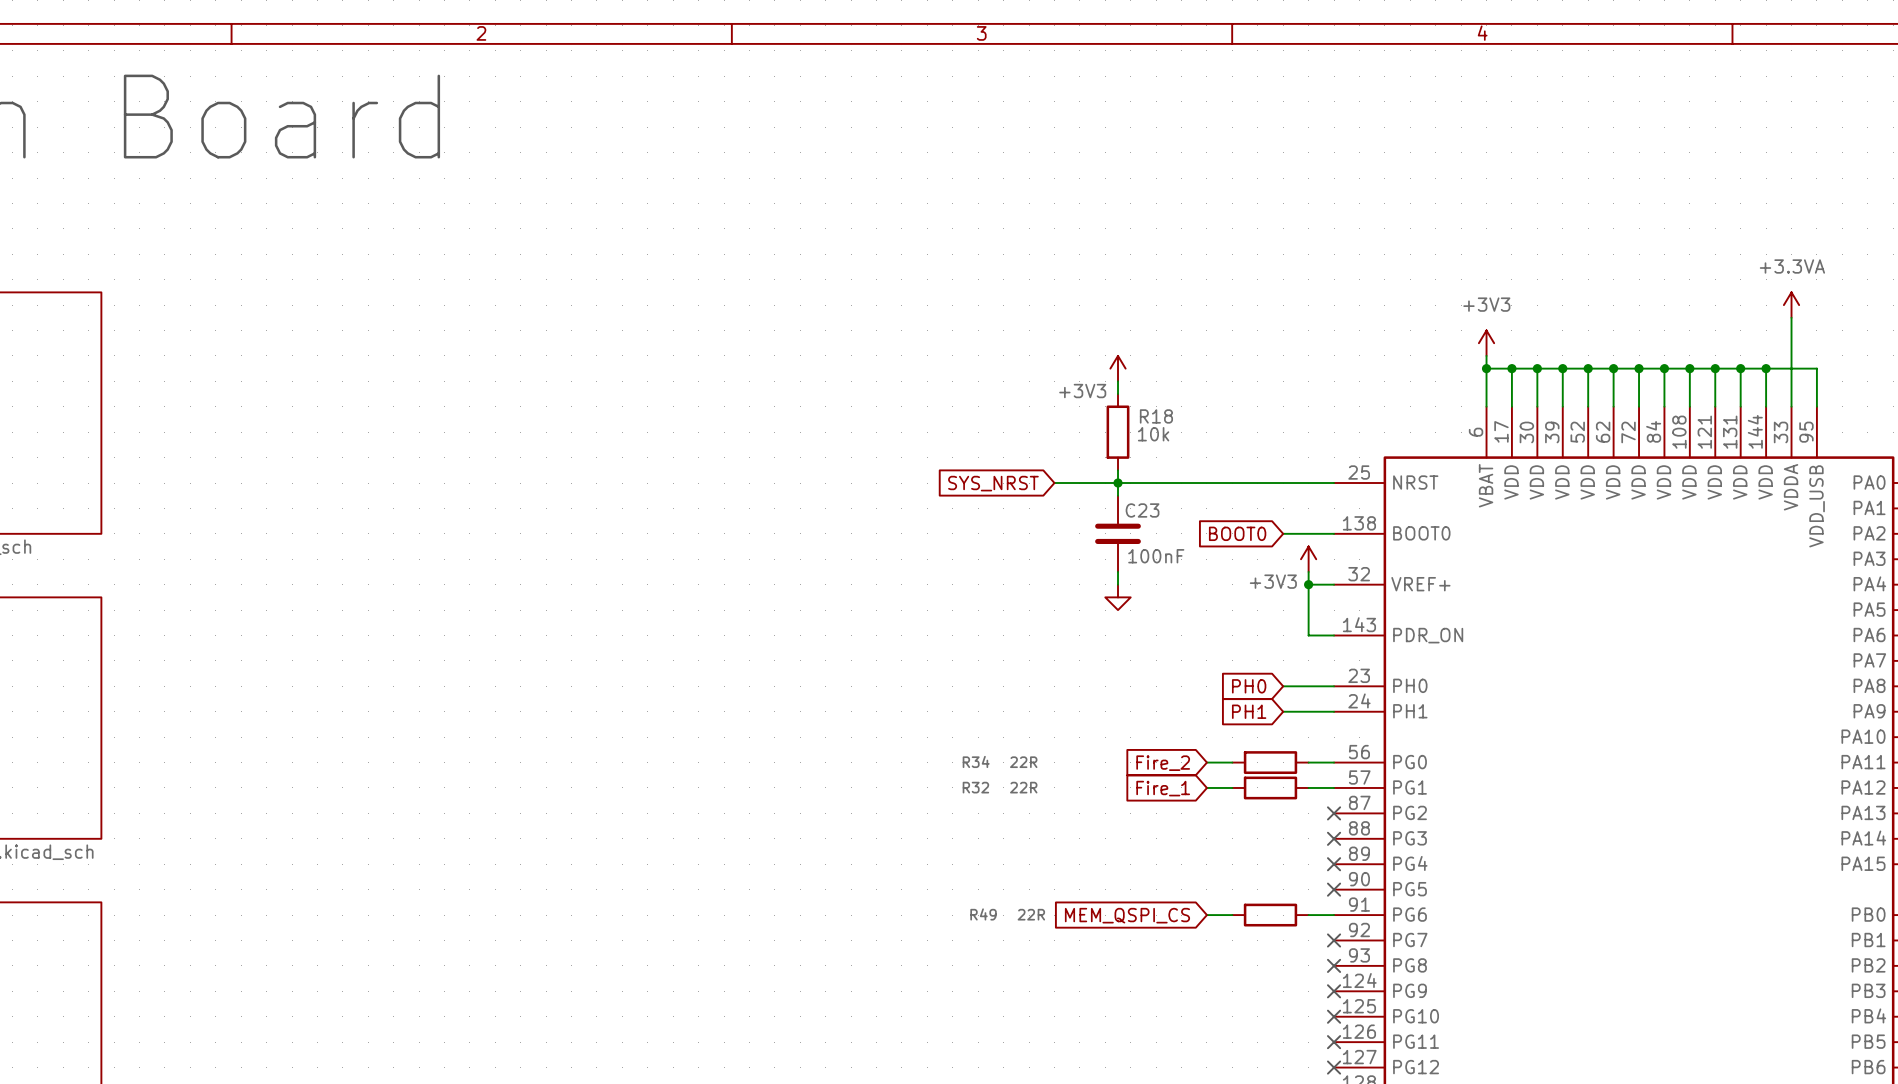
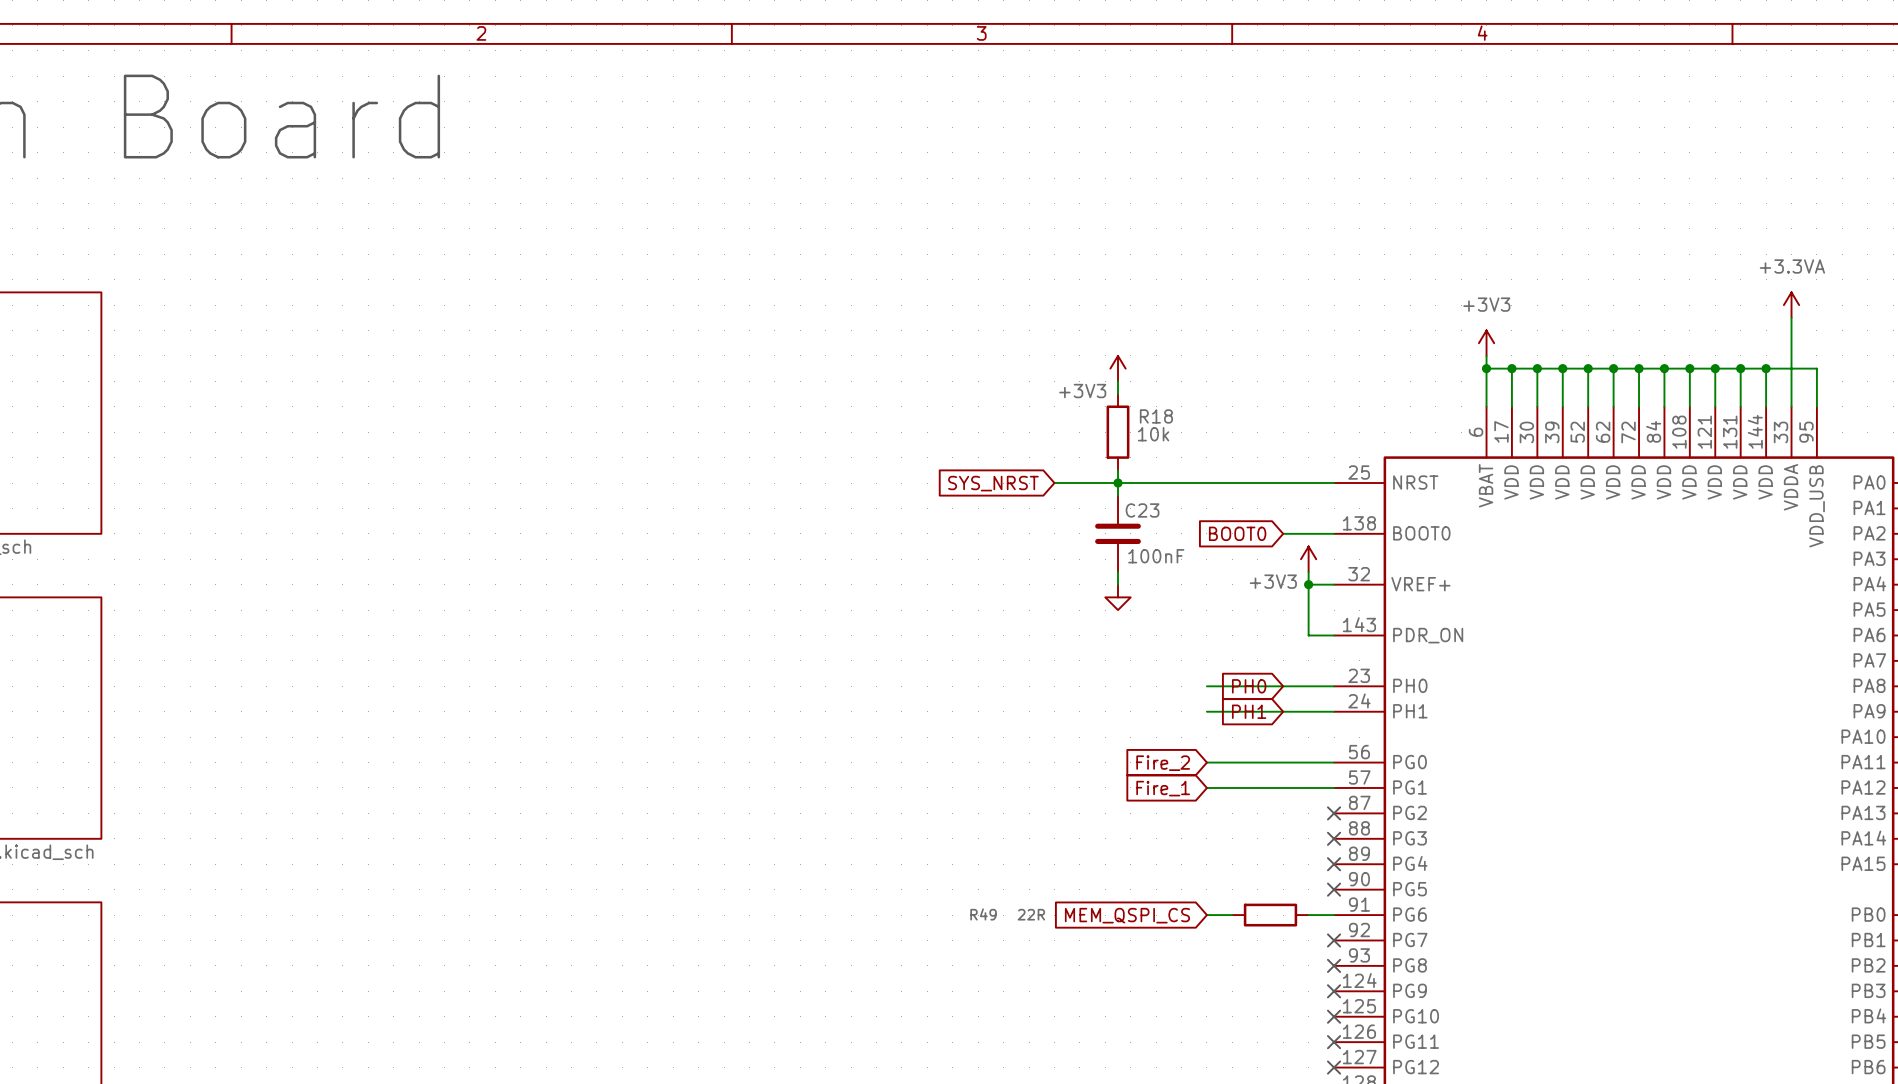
wire: none -> (1206, 686) (1283, 686)
wire: none -> (1206, 711) (1283, 711)
wire: none -> (1232, 762) (1308, 762)
R34: 22R (1270, 762) -> none
wire: none -> (1232, 787) (1308, 787)
R32: 22R (1270, 787) -> none

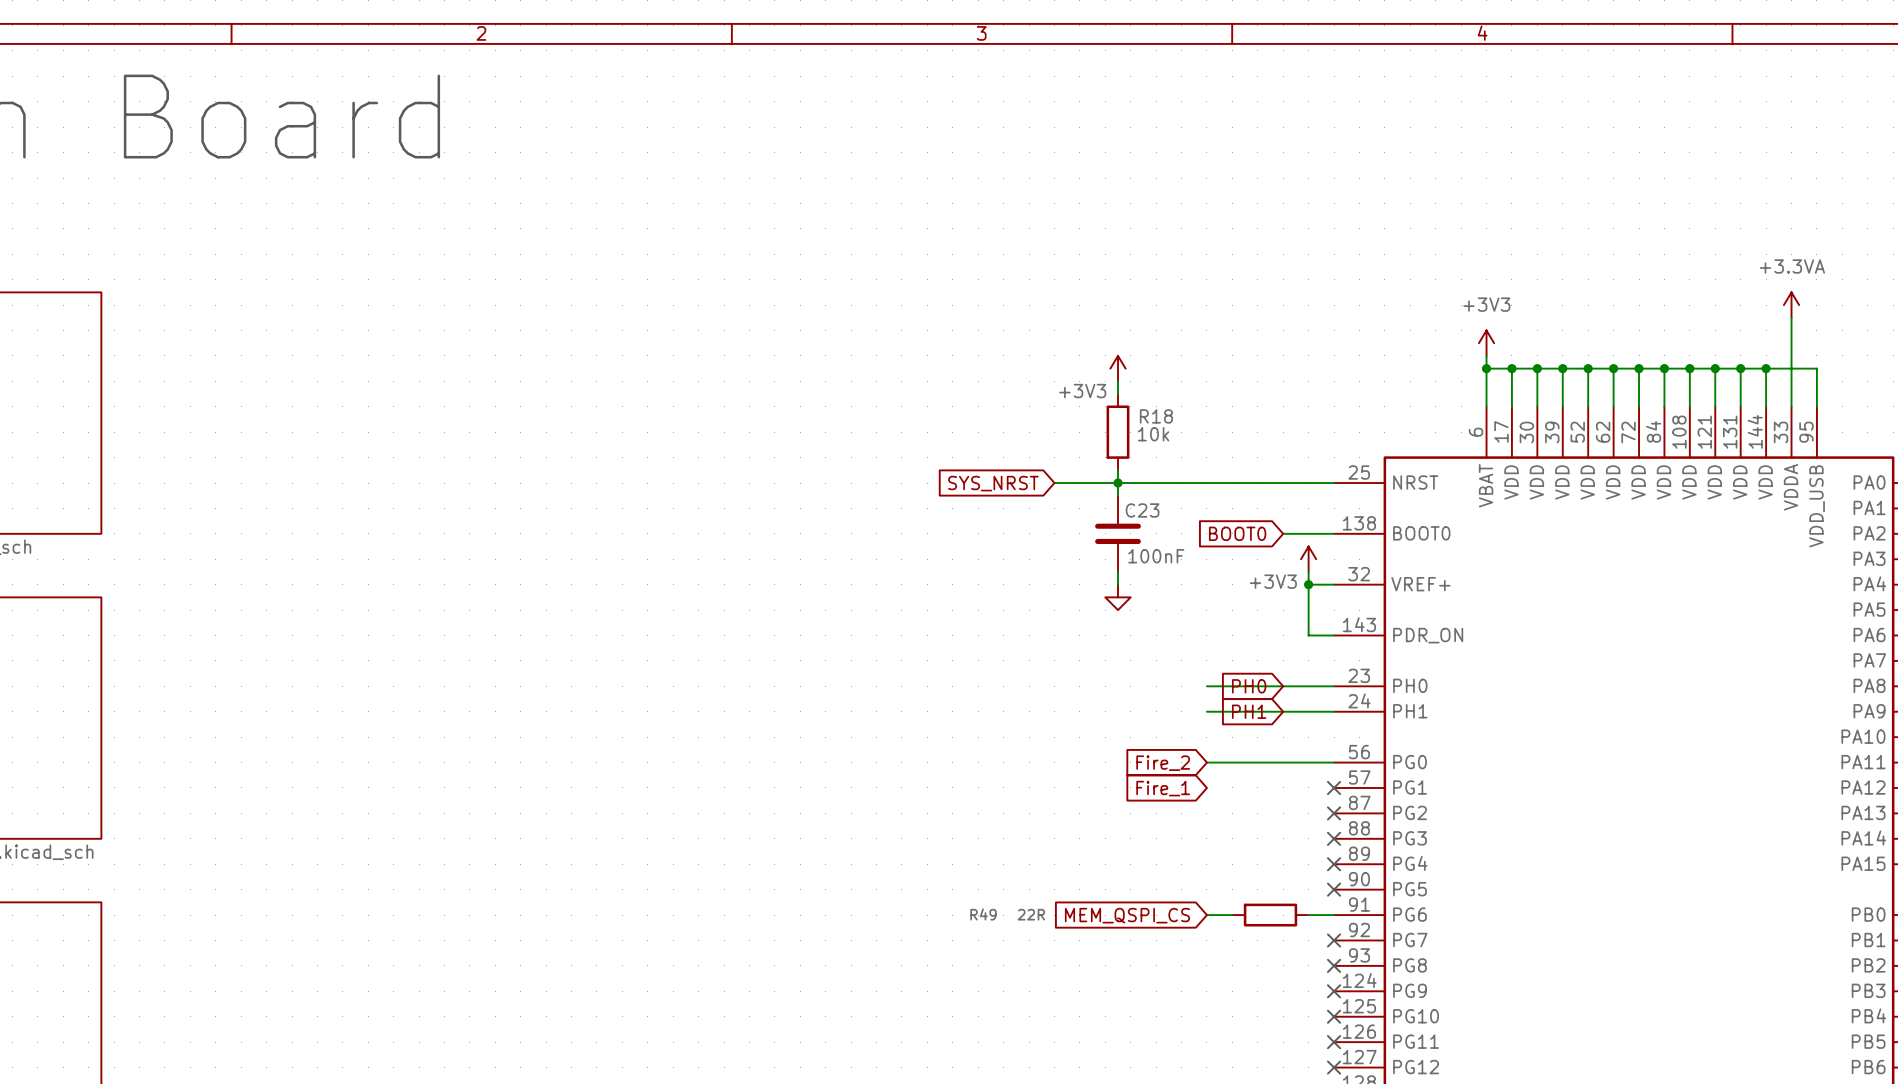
wire: (1206, 787) (1334, 787) -> none
no-connect mark: none -> (1334, 787)

